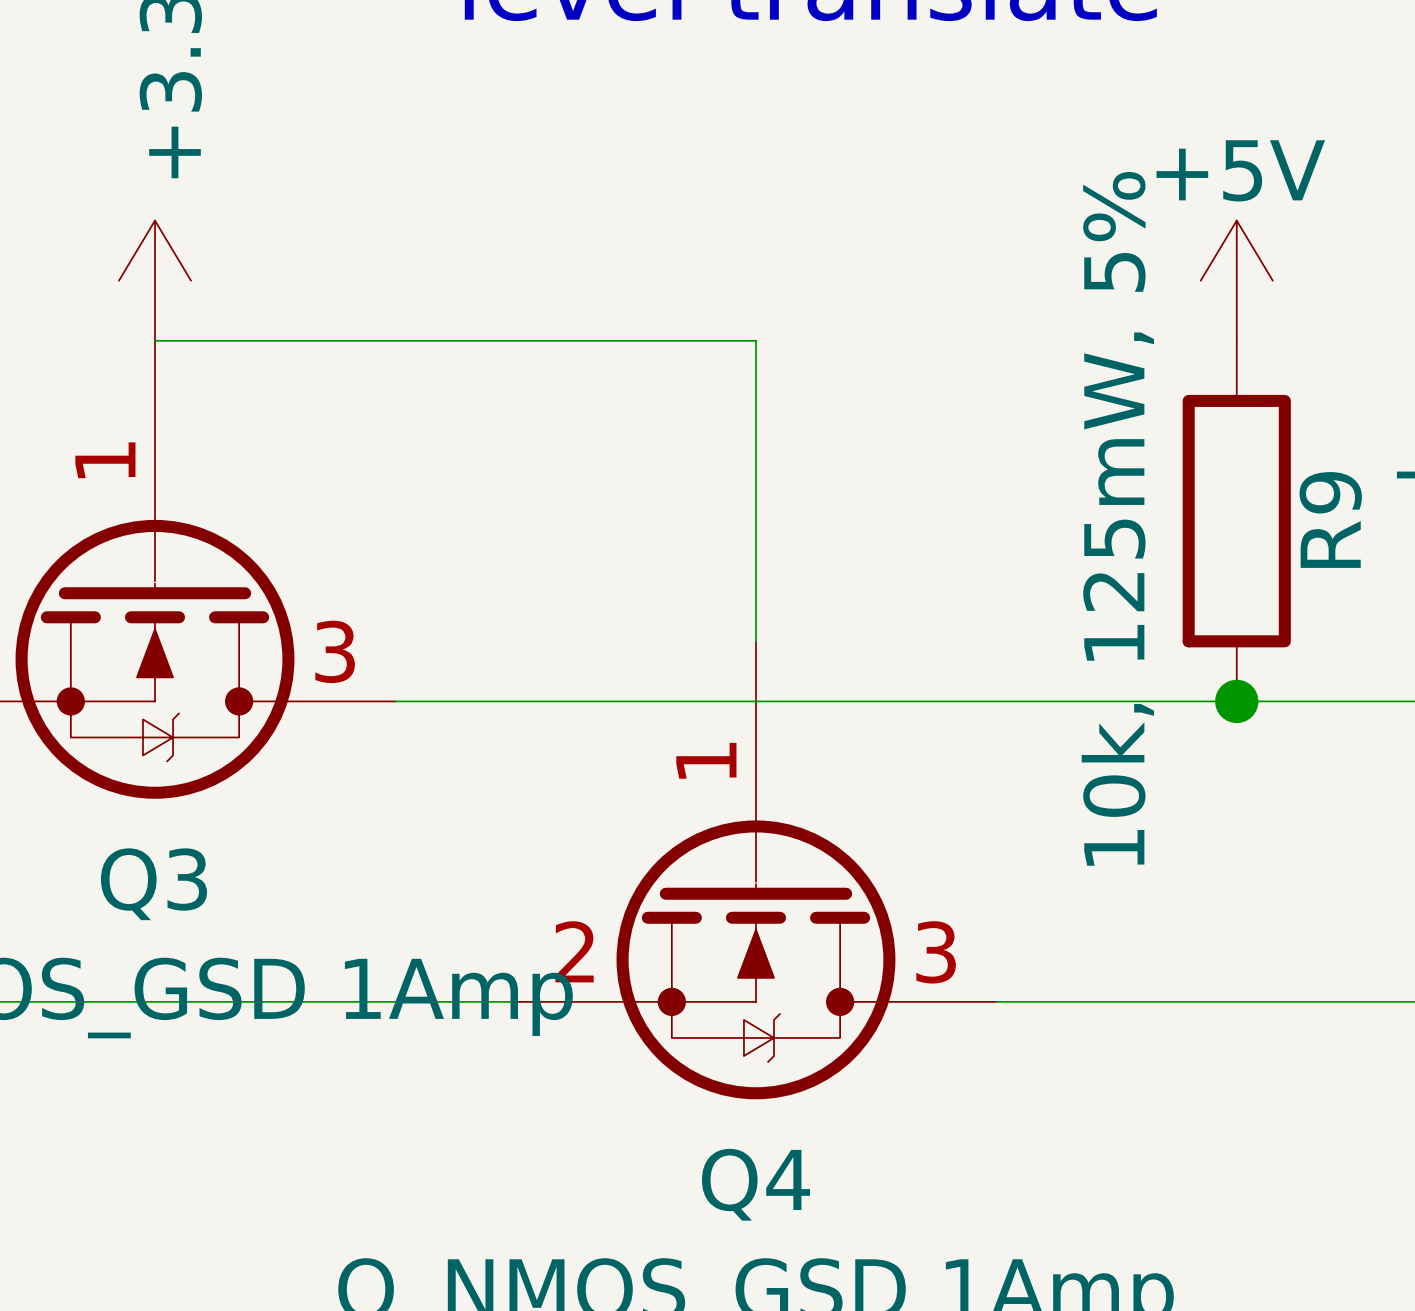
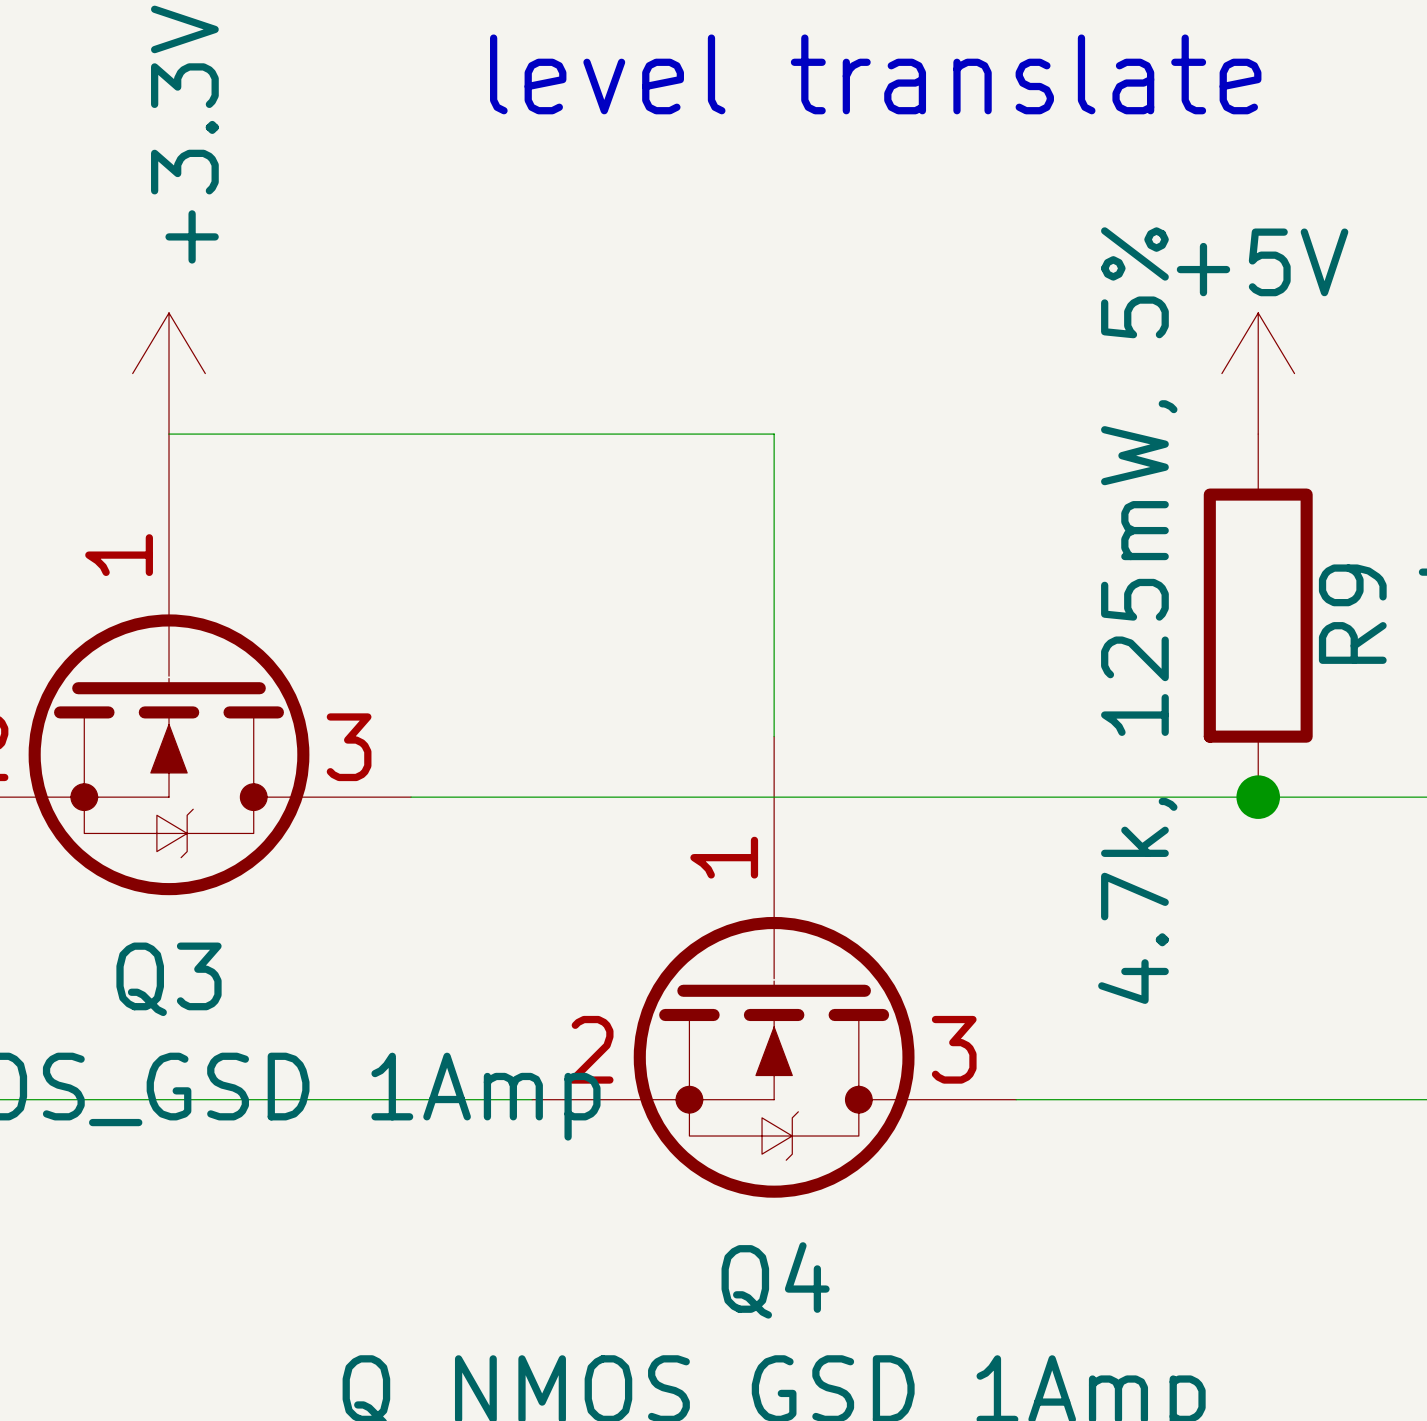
R9 value: 10k, 125mW, 5% (1117, 518) -> 4.7k, 125mW, 5% (1137, 615)

